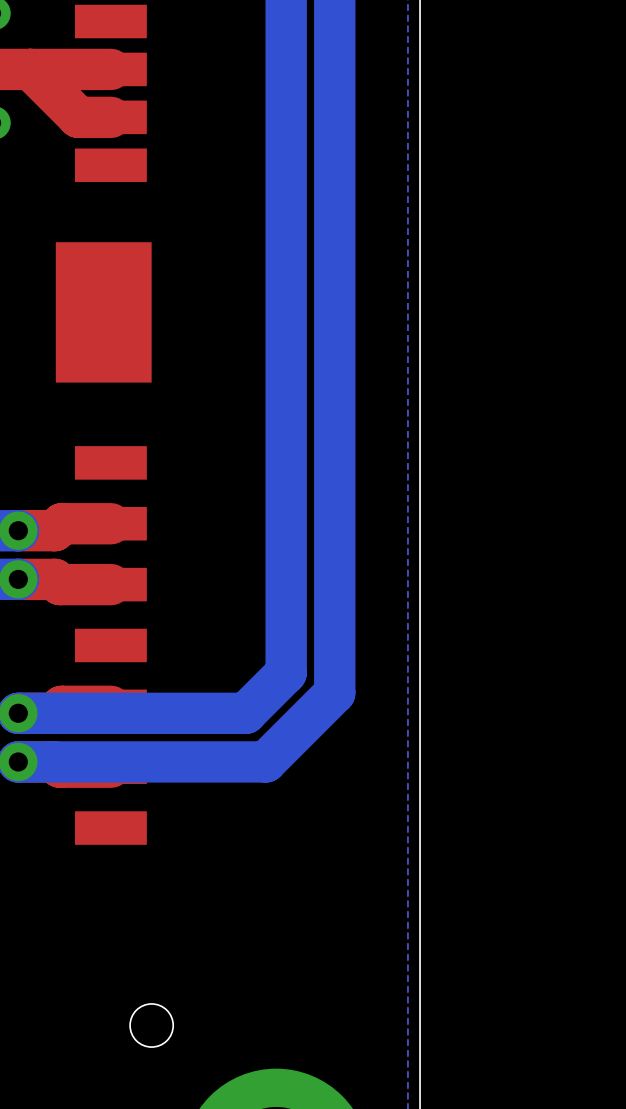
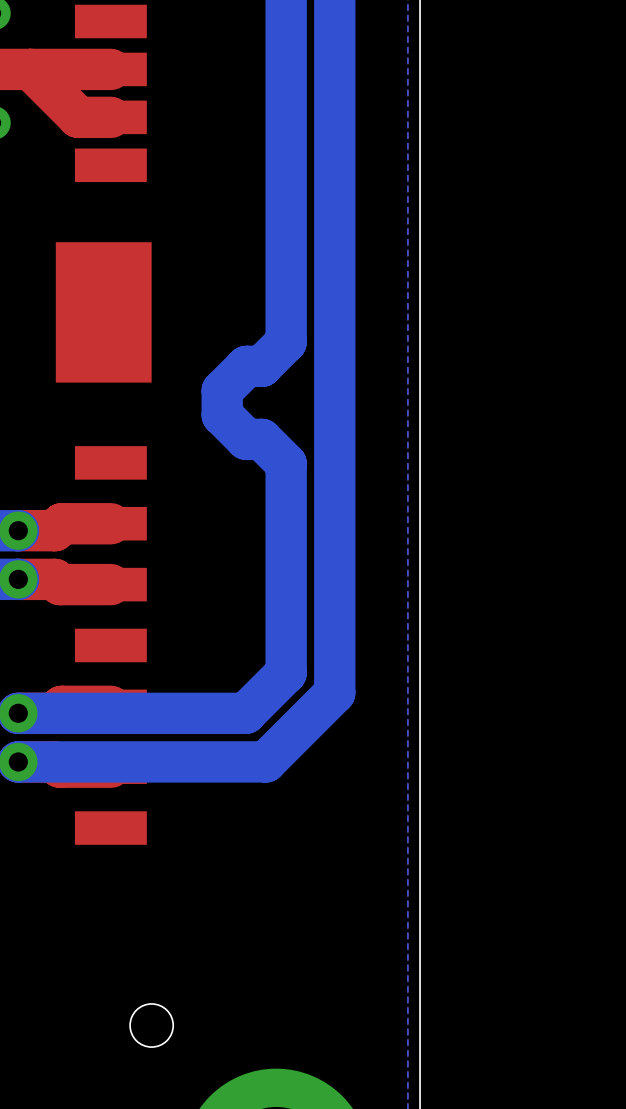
bottom track: (286, 341) (286, 463) -> (286, 341) (261, 366) (246, 366) (222, 390) (222, 415) (246, 439) (261, 439) (286, 463)

